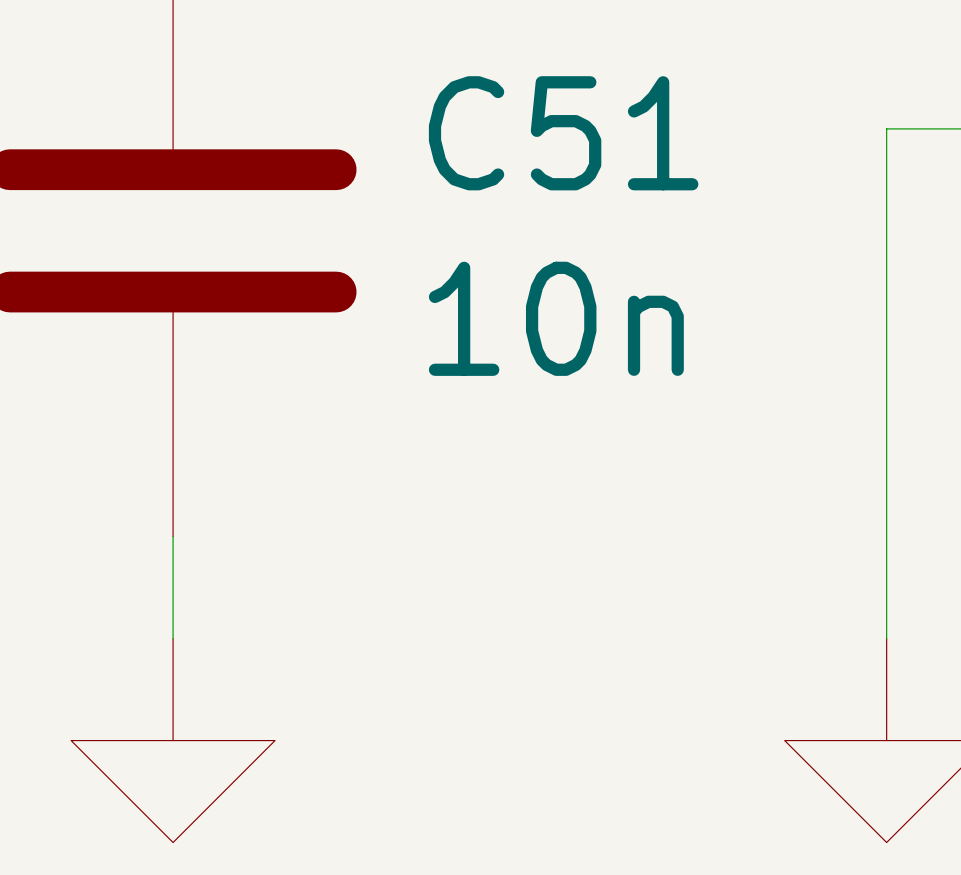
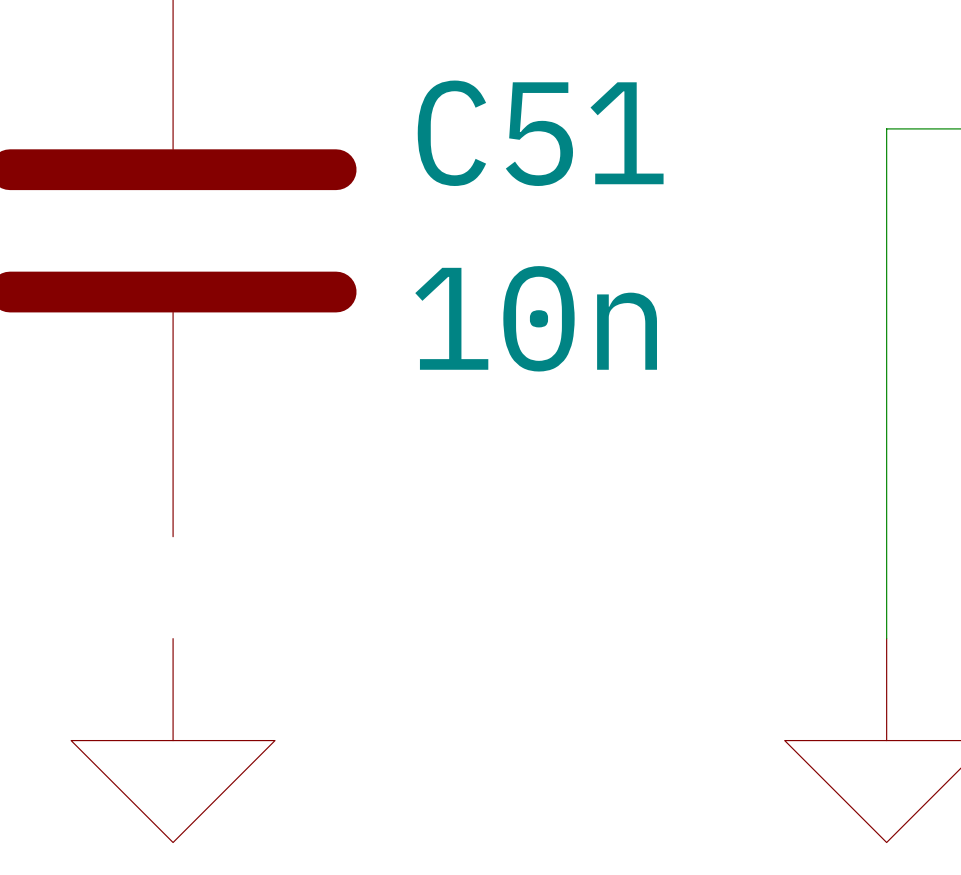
wire: (173, 536) (173, 638) -> none

